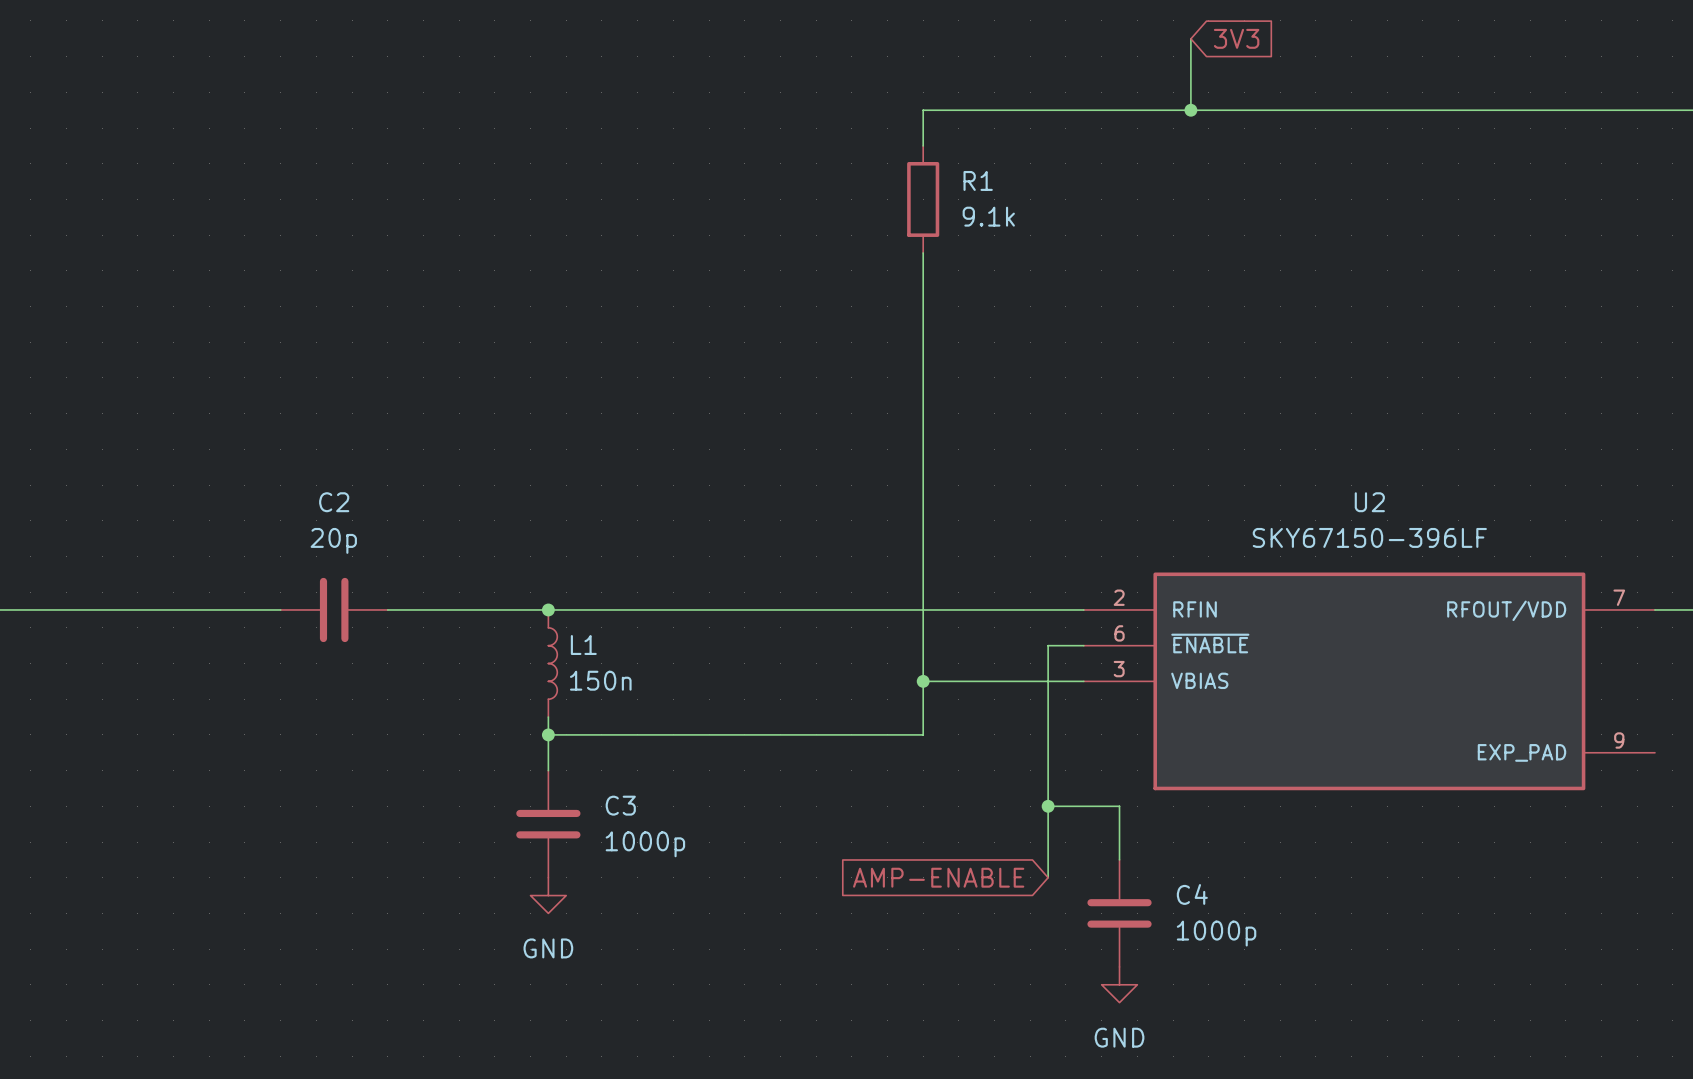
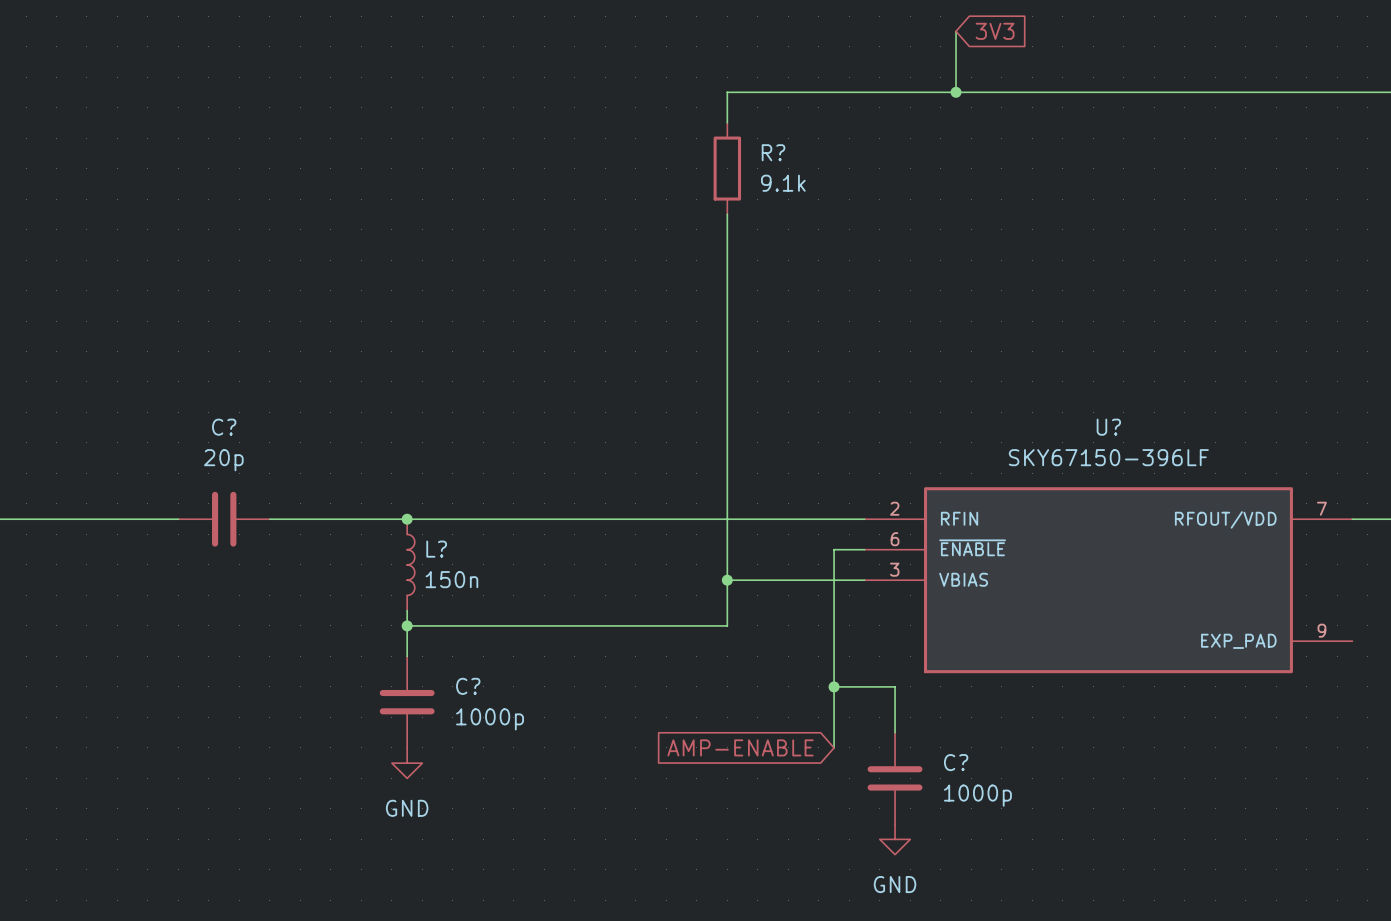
R1 name: R1 (978, 180) -> R? (773, 152)
C2 name: C2 (334, 502) -> C? (224, 427)
U2 name: U2 (1369, 502) -> U? (1108, 427)
L1 name: L1 (583, 645) -> L? (436, 549)
C3 name: C3 (620, 805) -> C? (468, 686)
C4 name: C4 (1192, 894) -> C? (956, 762)

